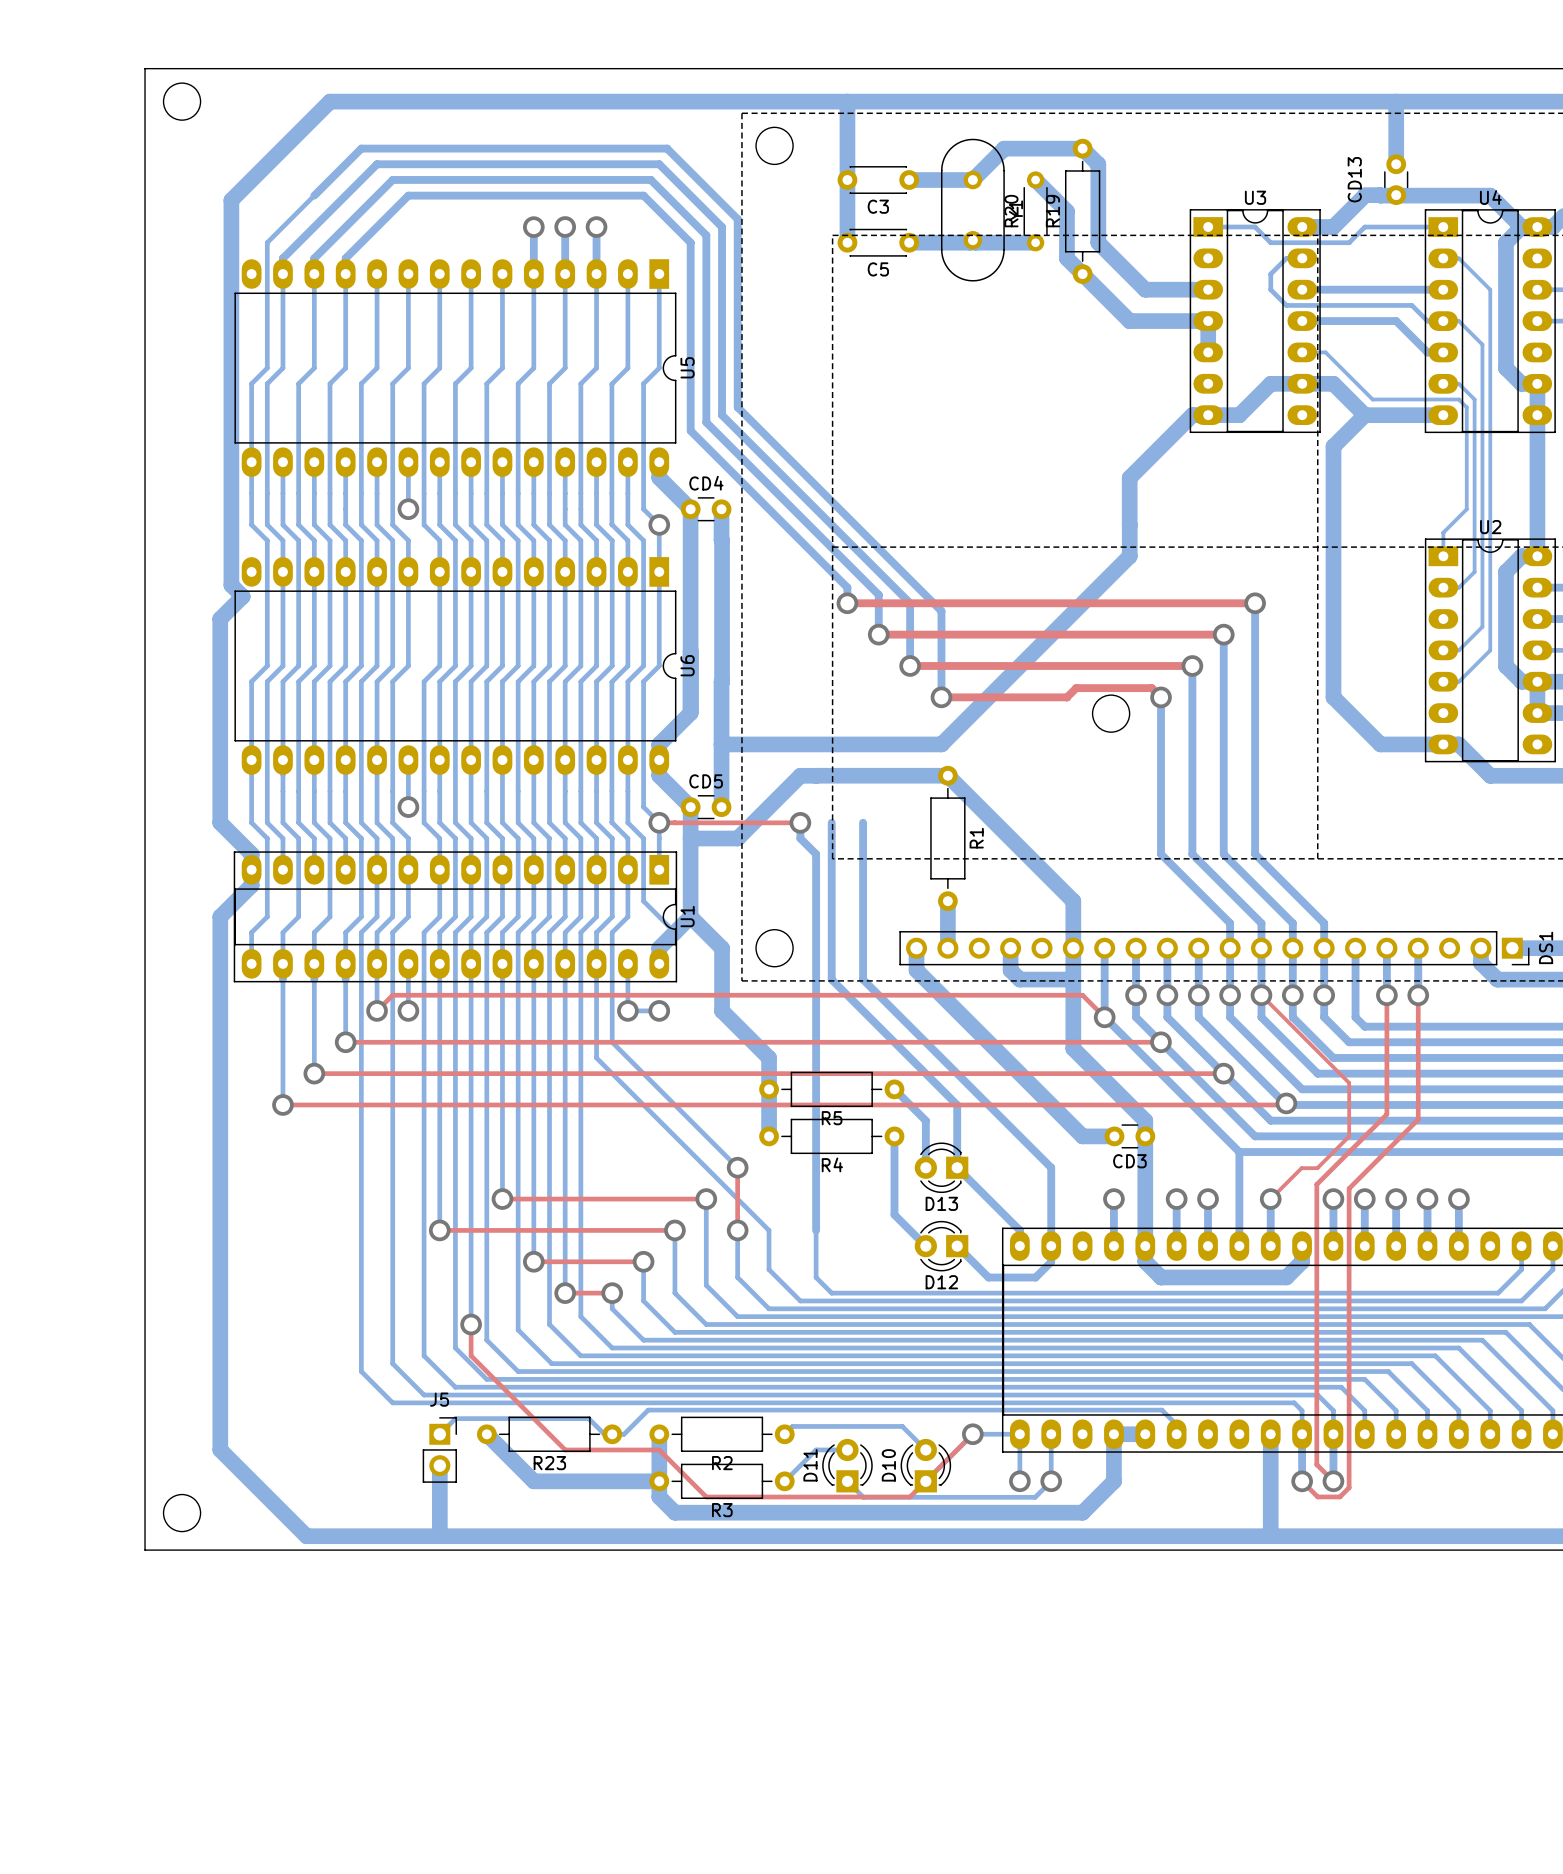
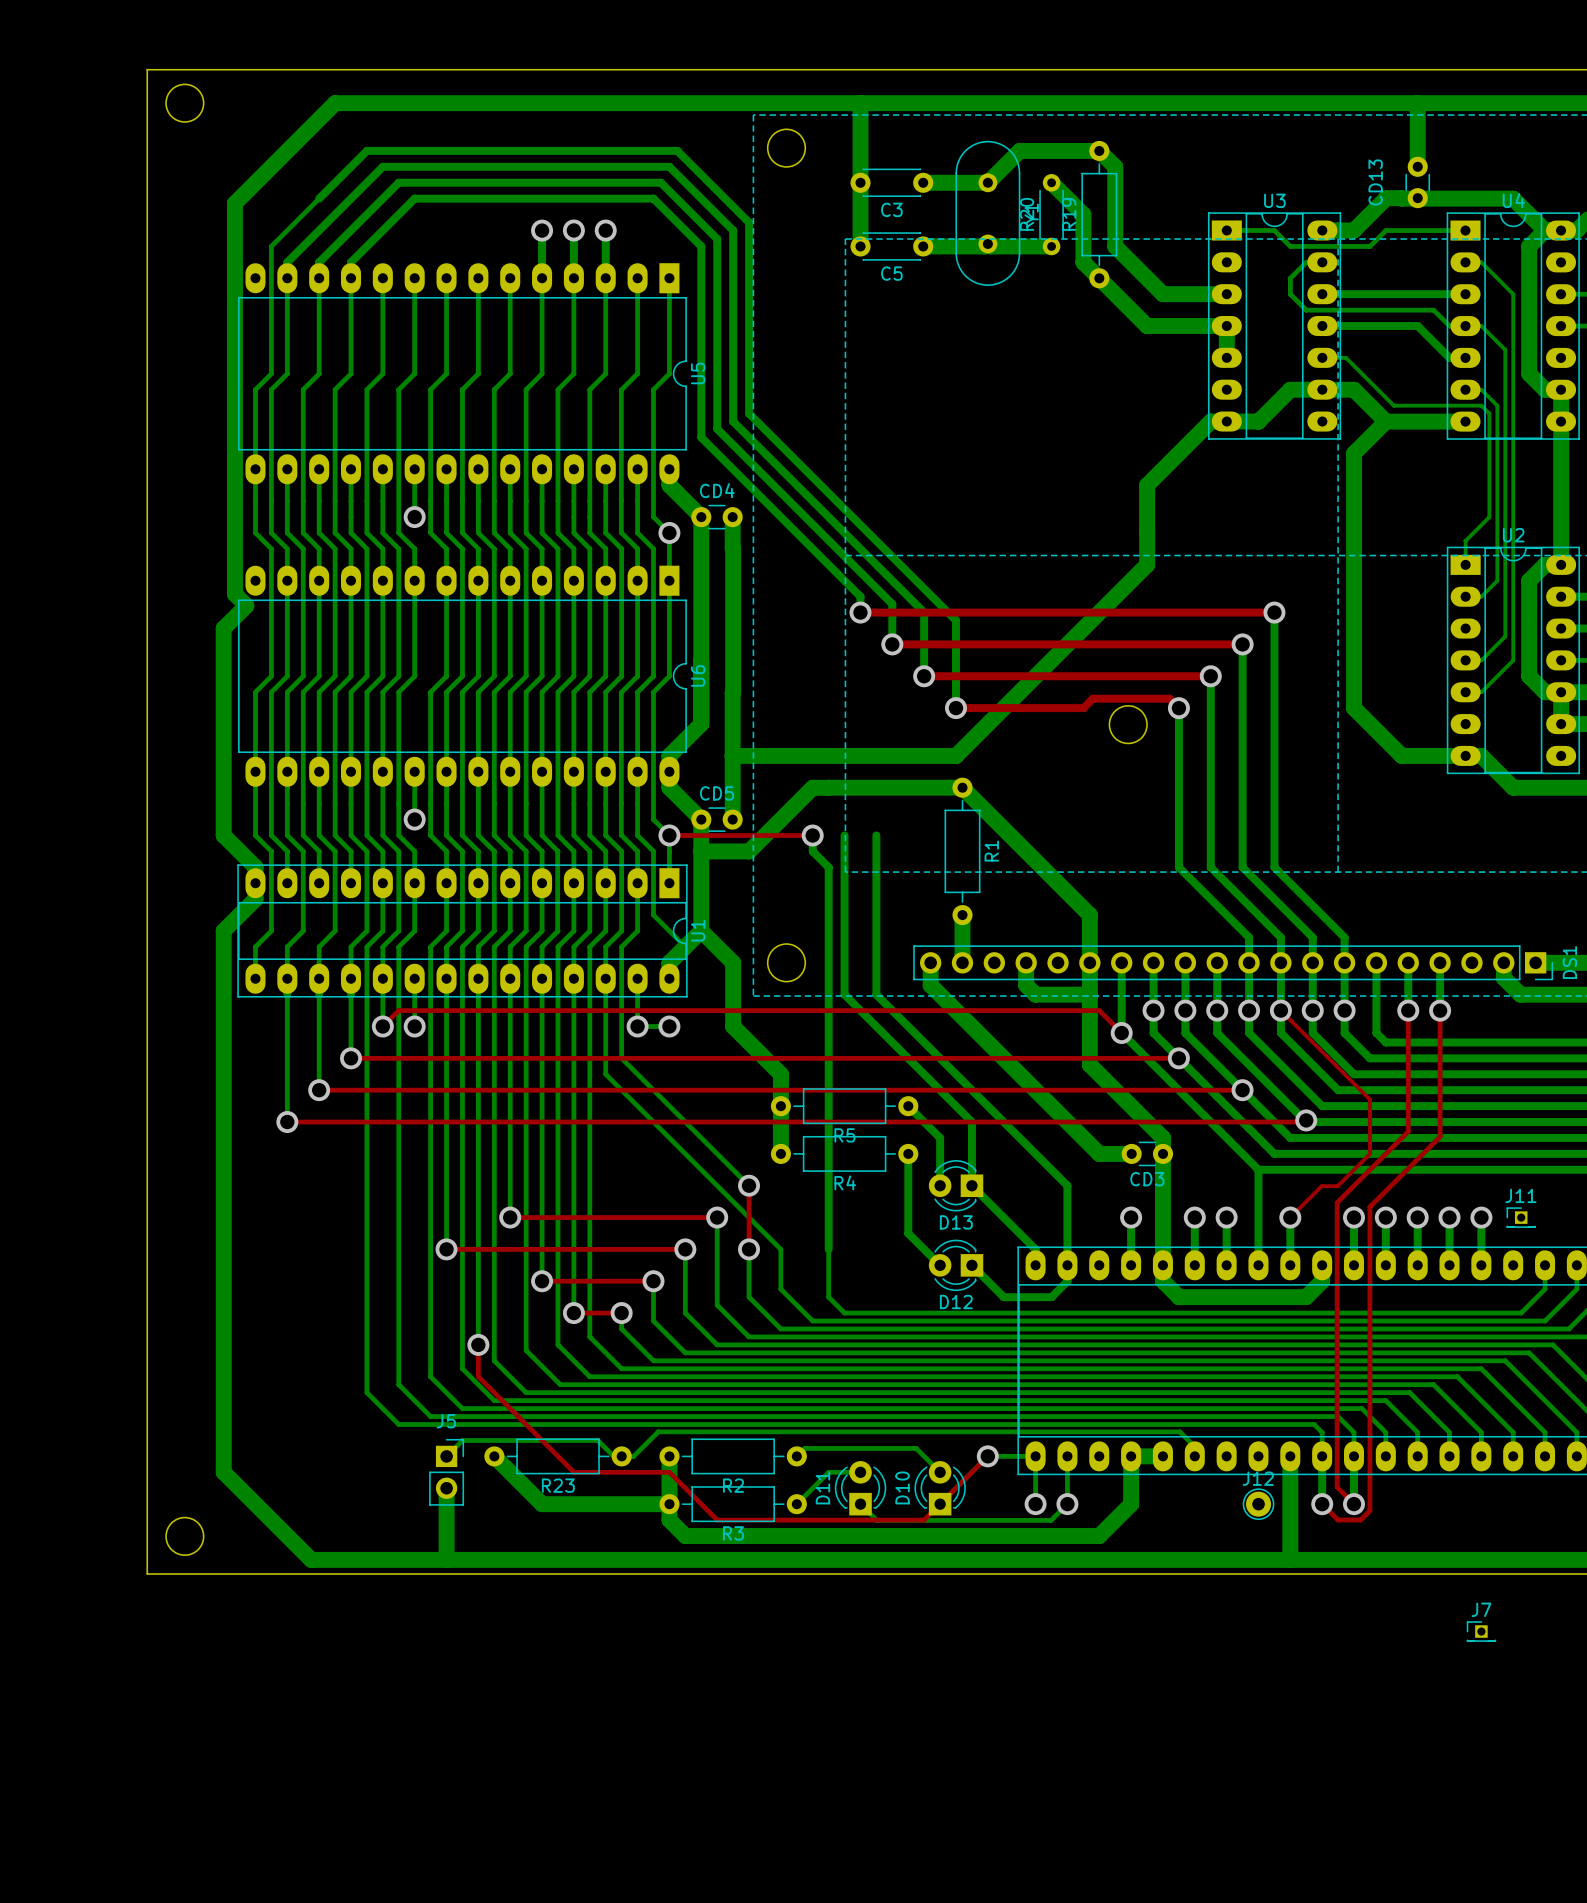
J11: none -> (1521, 1217)
J12: none -> (1258, 1504)
J7: none -> (1481, 1631)

